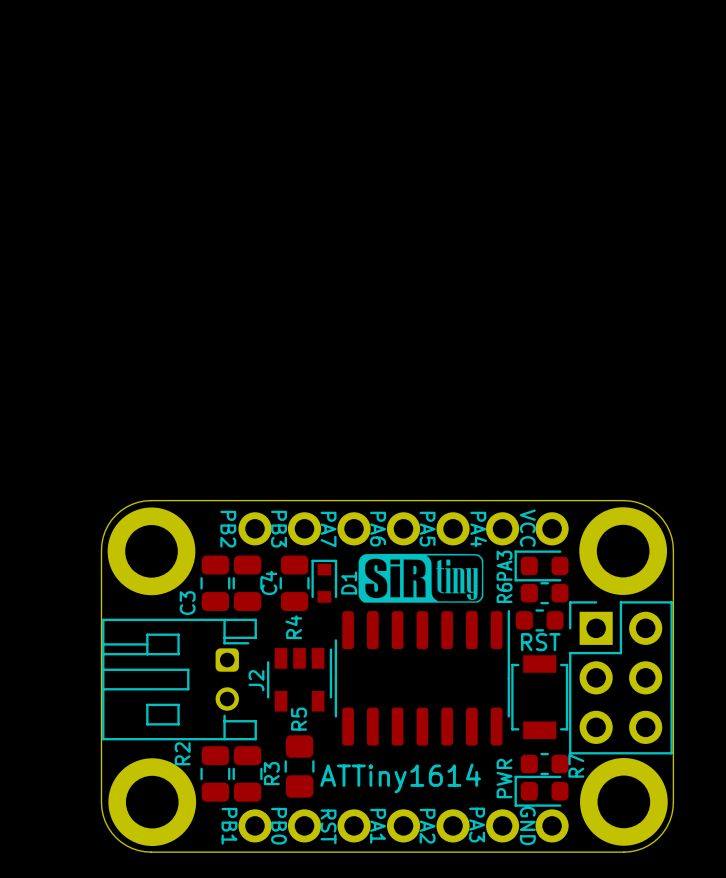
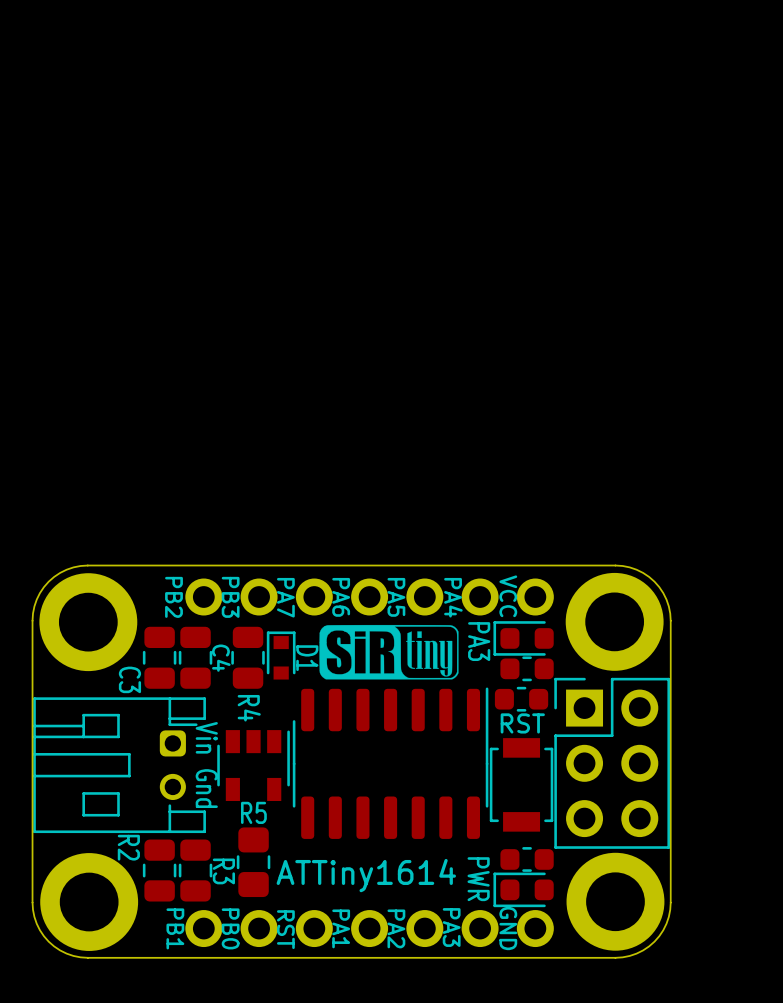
PA3 name rotation: 0° (504, 565) -> 180° (479, 641)
C4 name rotation: 0° (269, 582) -> 180° (221, 658)
D1 name rotation: 0° (349, 582) -> 180° (307, 658)
R6 name: R6 (504, 592) -> none
C3 name rotation: 0° (187, 603) -> 180° (129, 679)
R4 name rotation: 0° (293, 627) -> 180° (249, 708)
J2 name: J2 (256, 680) -> Vin Gnd (206, 765)
R5 name rotation: 0° (299, 719) -> 90° clockwise (253, 812)
R2 name rotation: 0° (182, 753) -> 180° (128, 847)
R7 name: R7 (576, 765) -> none
R3 name rotation: 0° (271, 773) -> 180° (223, 871)
PWR name rotation: 0° (504, 778) -> 180° (478, 879)

